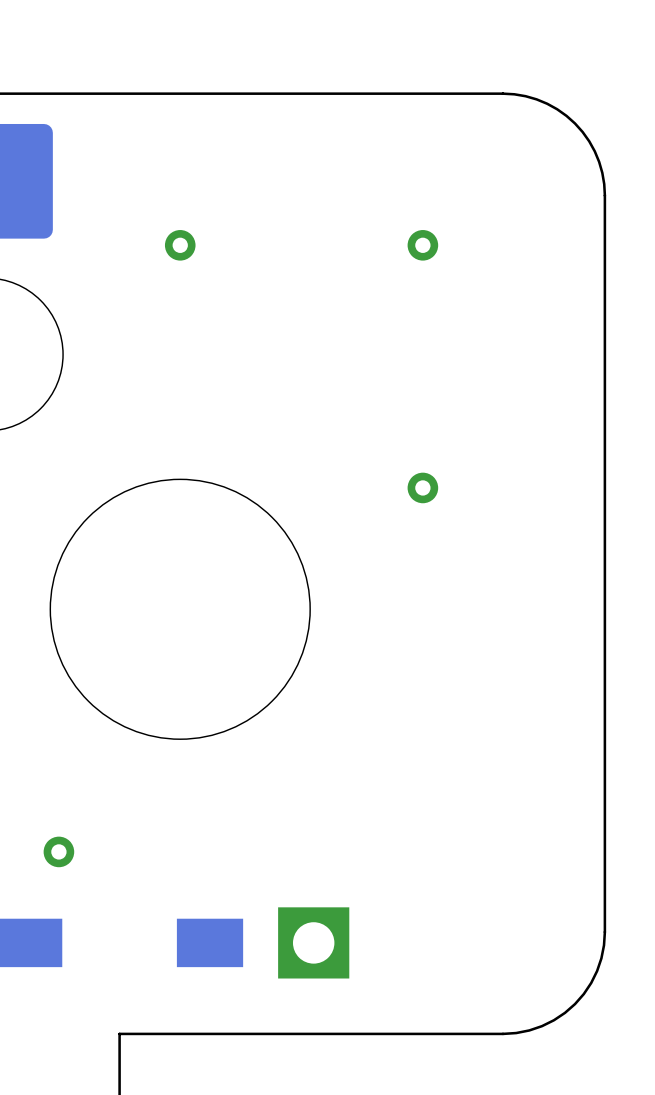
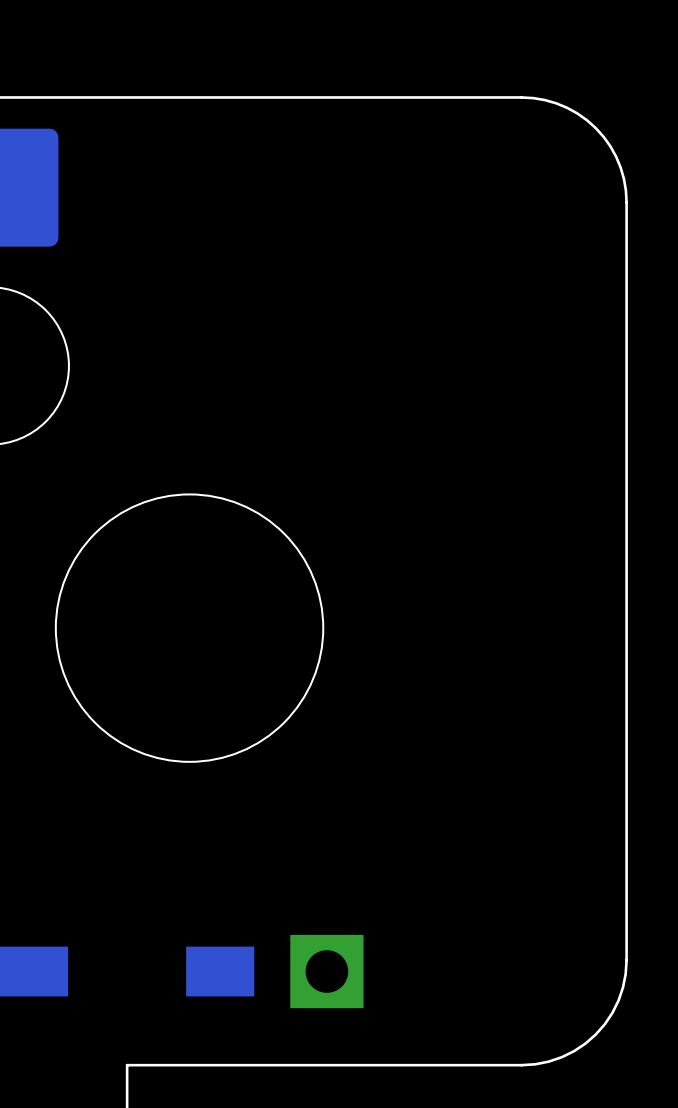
via: (180, 245) -> none
via: (422, 245) -> none
via: (422, 487) -> none
via: (58, 851) -> none

